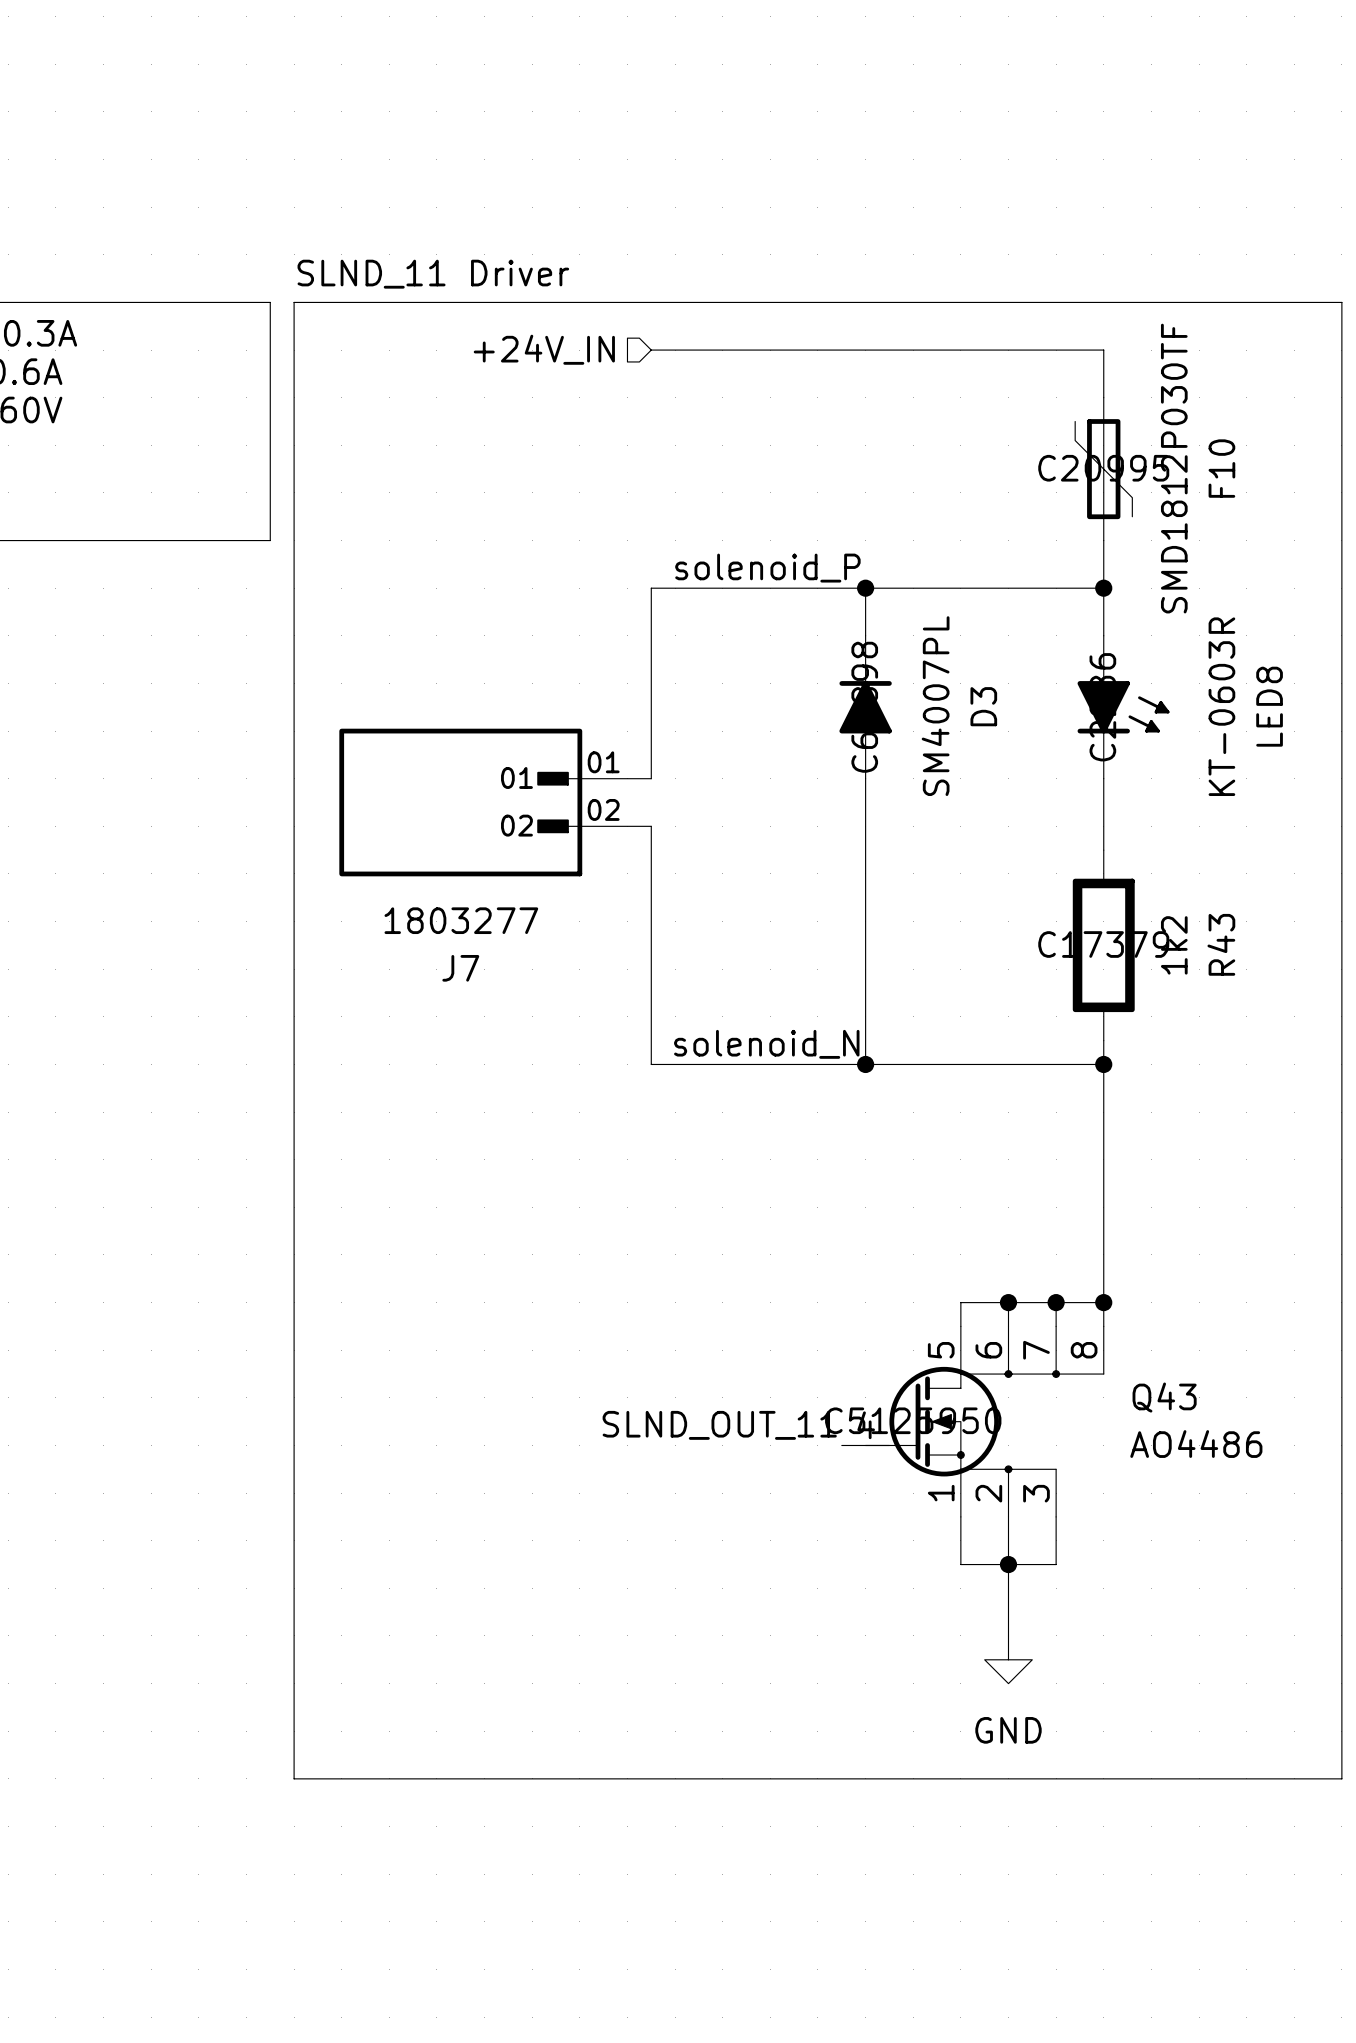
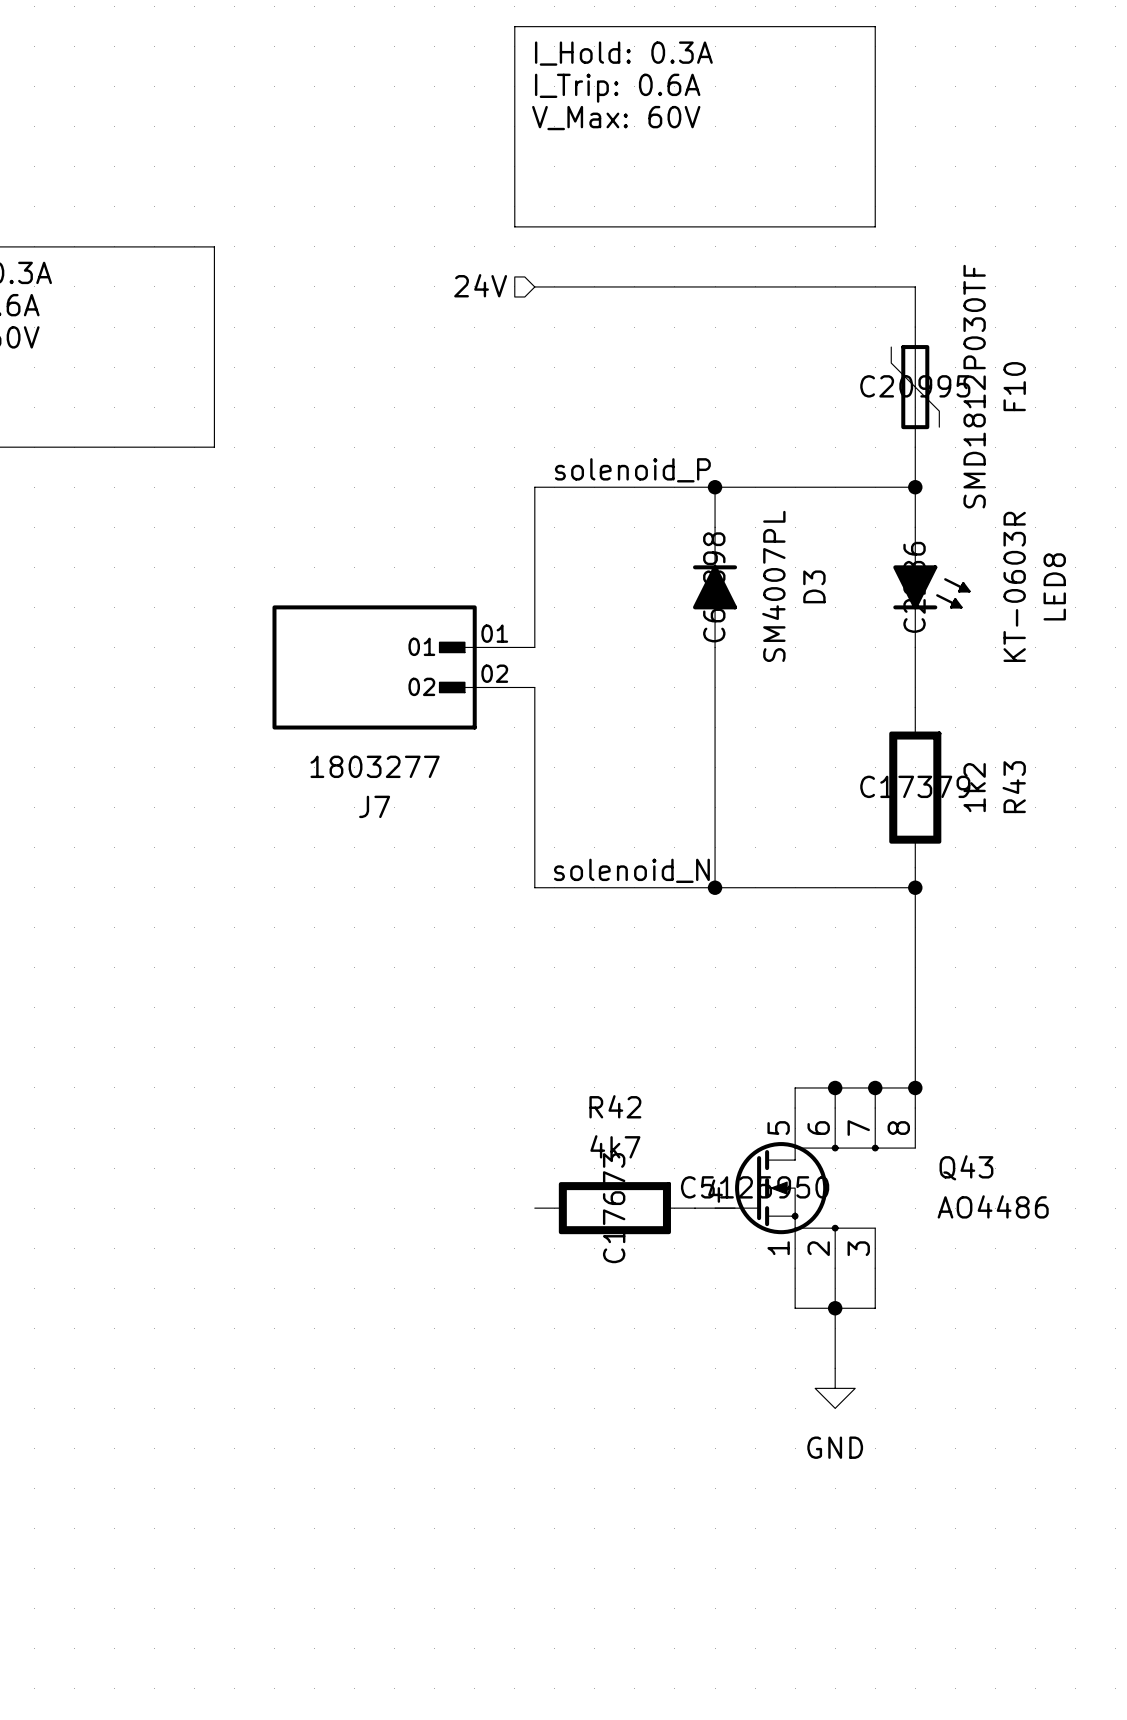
line: none -> (514, 26) (875, 26) (875, 226) (514, 226) (514, 26)
text: none -> I_Hold: 0.3A (623, 53)
text: none -> I_Trip: 0.6A (617, 88)
text: none -> V_Max: 60V (616, 118)
text: SLND_11 Driver (433, 274) -> none
line: (294, 302) (1341, 302) (1341, 1778) (294, 1778) (294, 302) -> none
hierarchical label: +24V_IN (544, 349) -> 24V (480, 285)
label: SLND_OUT_11 (719, 1425) -> none
R42: none -> 4k7 (614, 1208)

